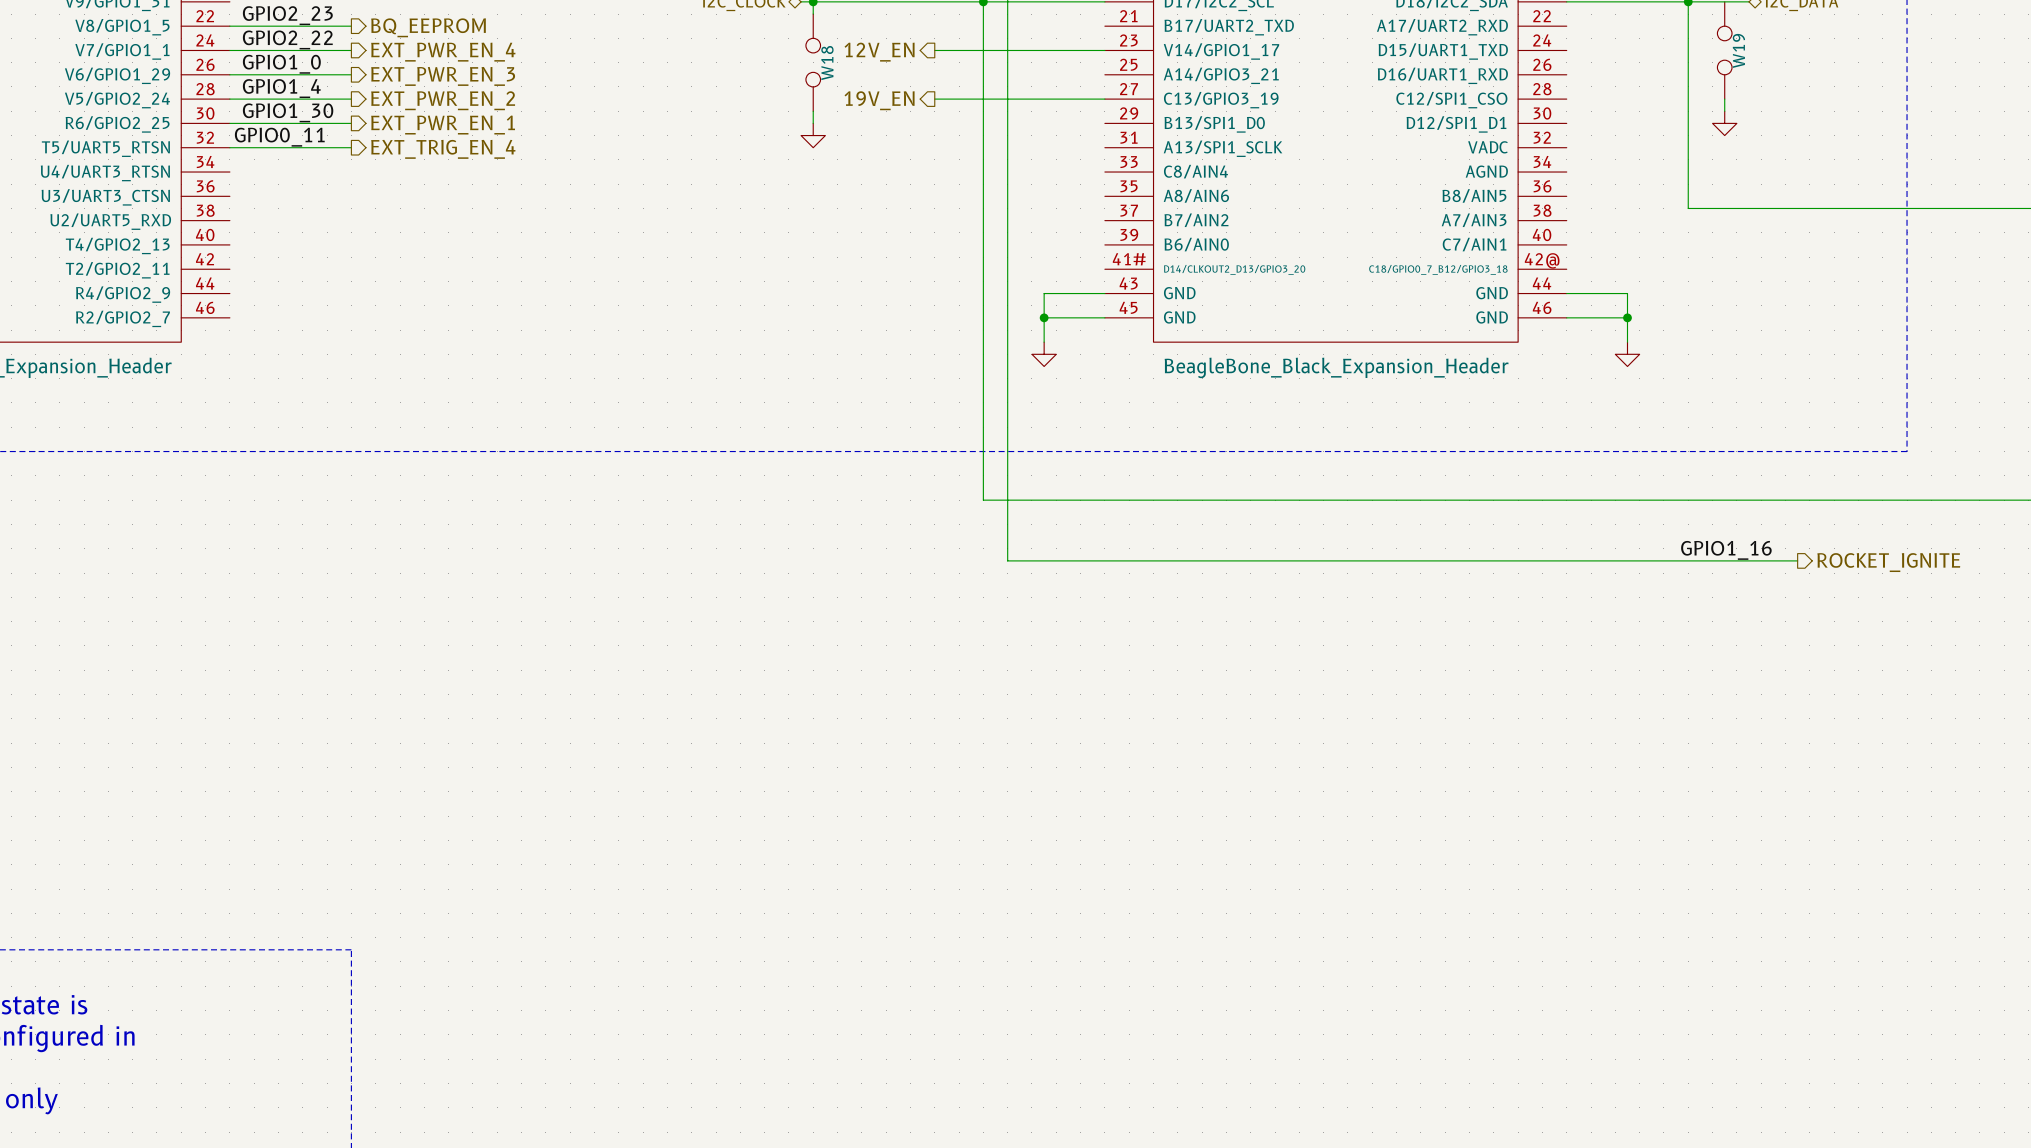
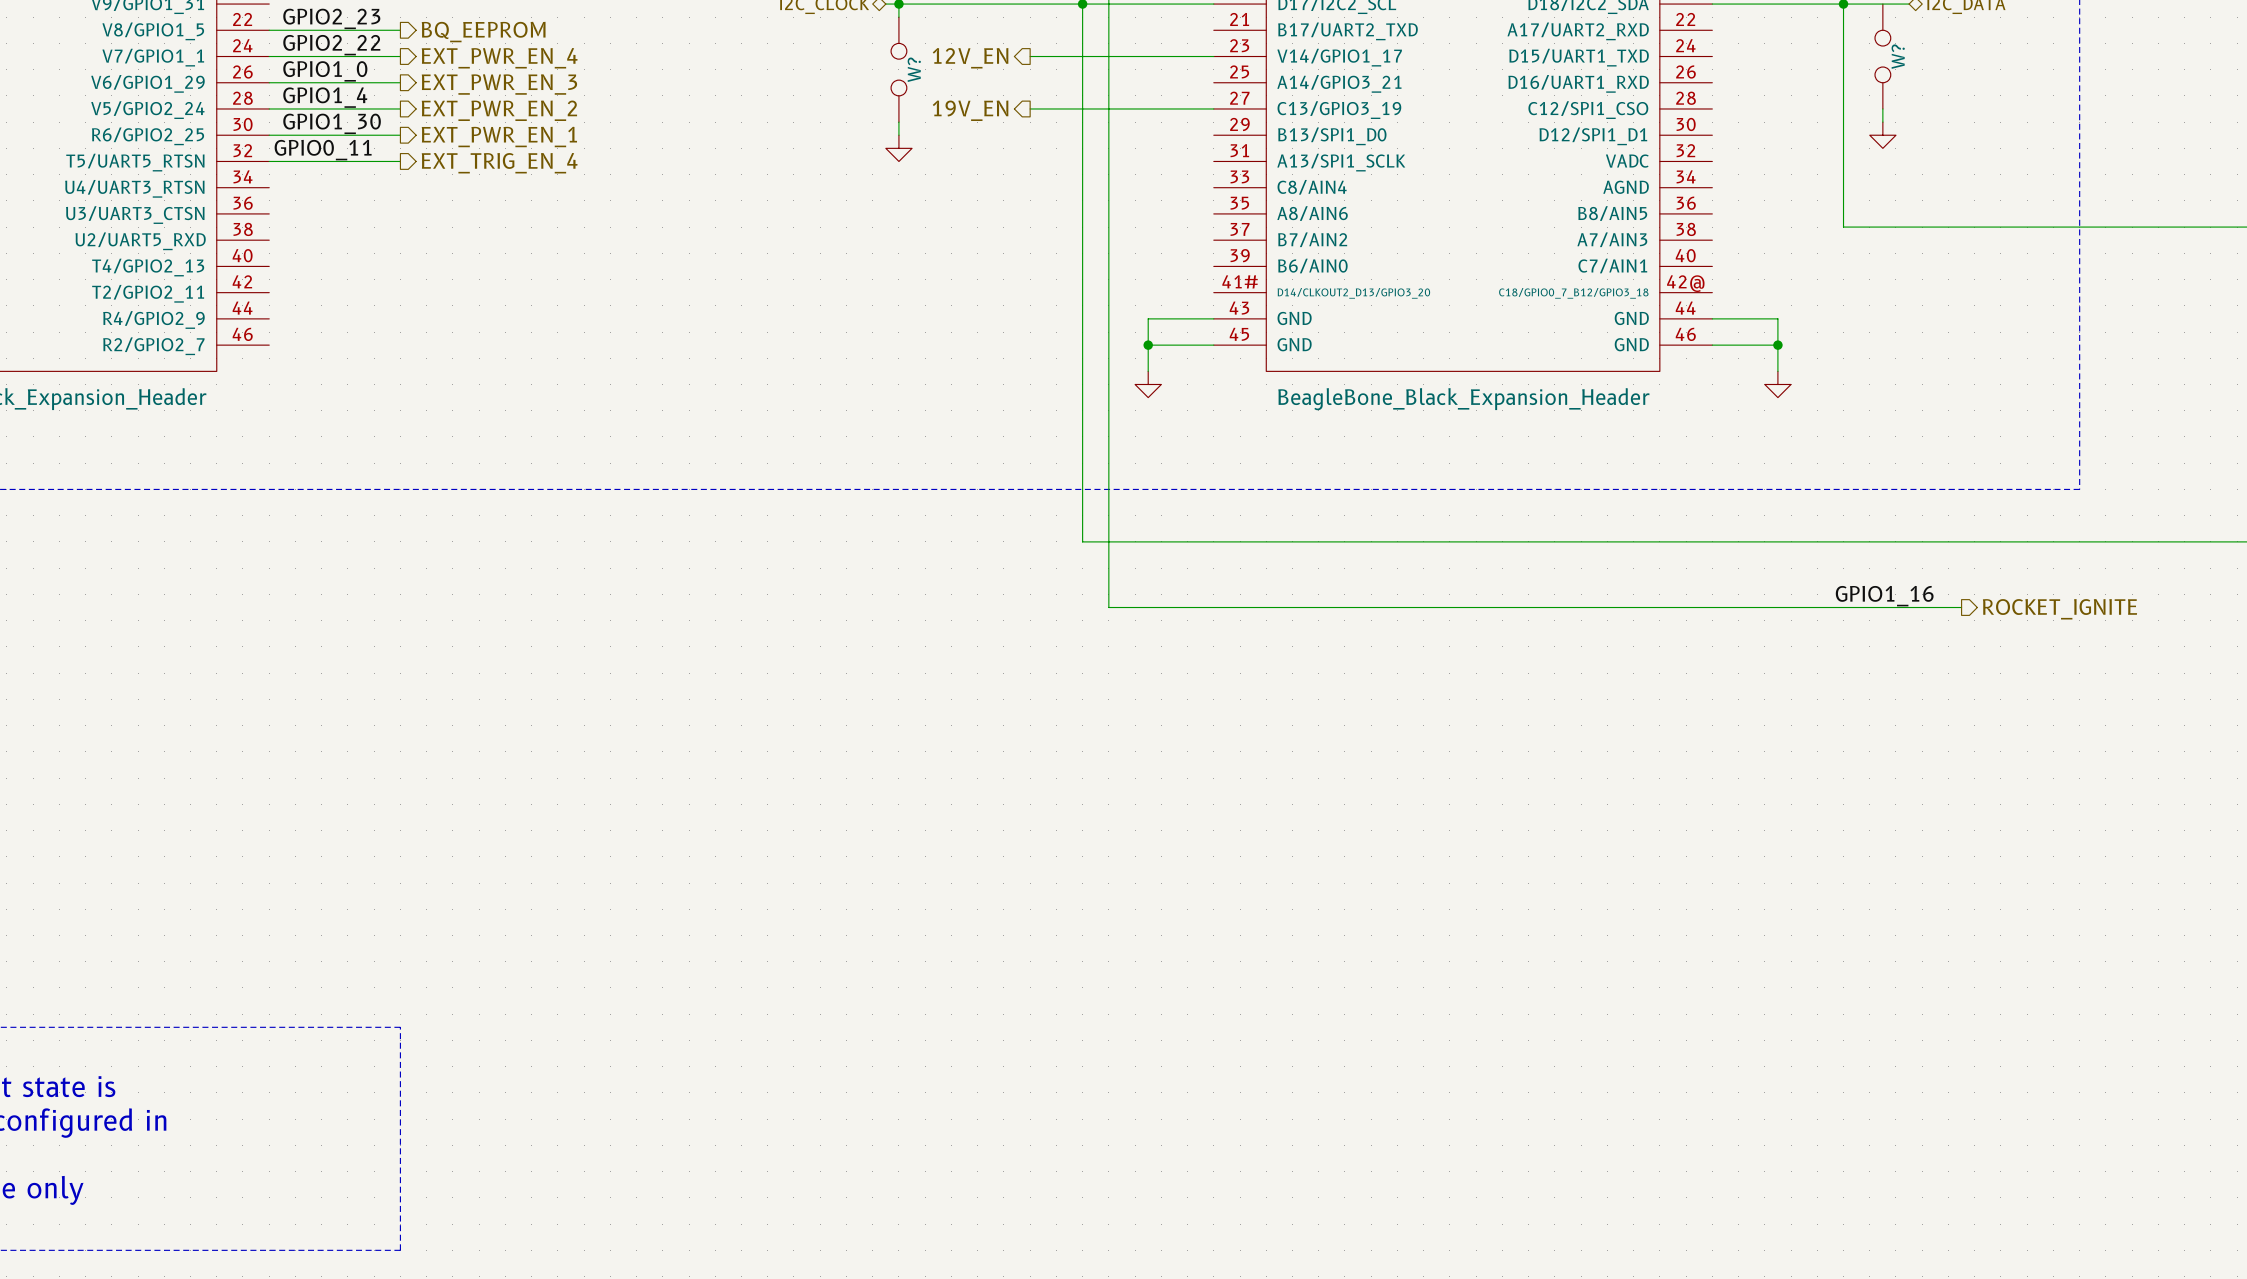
W19 name: W19 (1738, 50) -> W? (1898, 56)
W18 name: W18 (827, 63) -> W? (914, 69)

